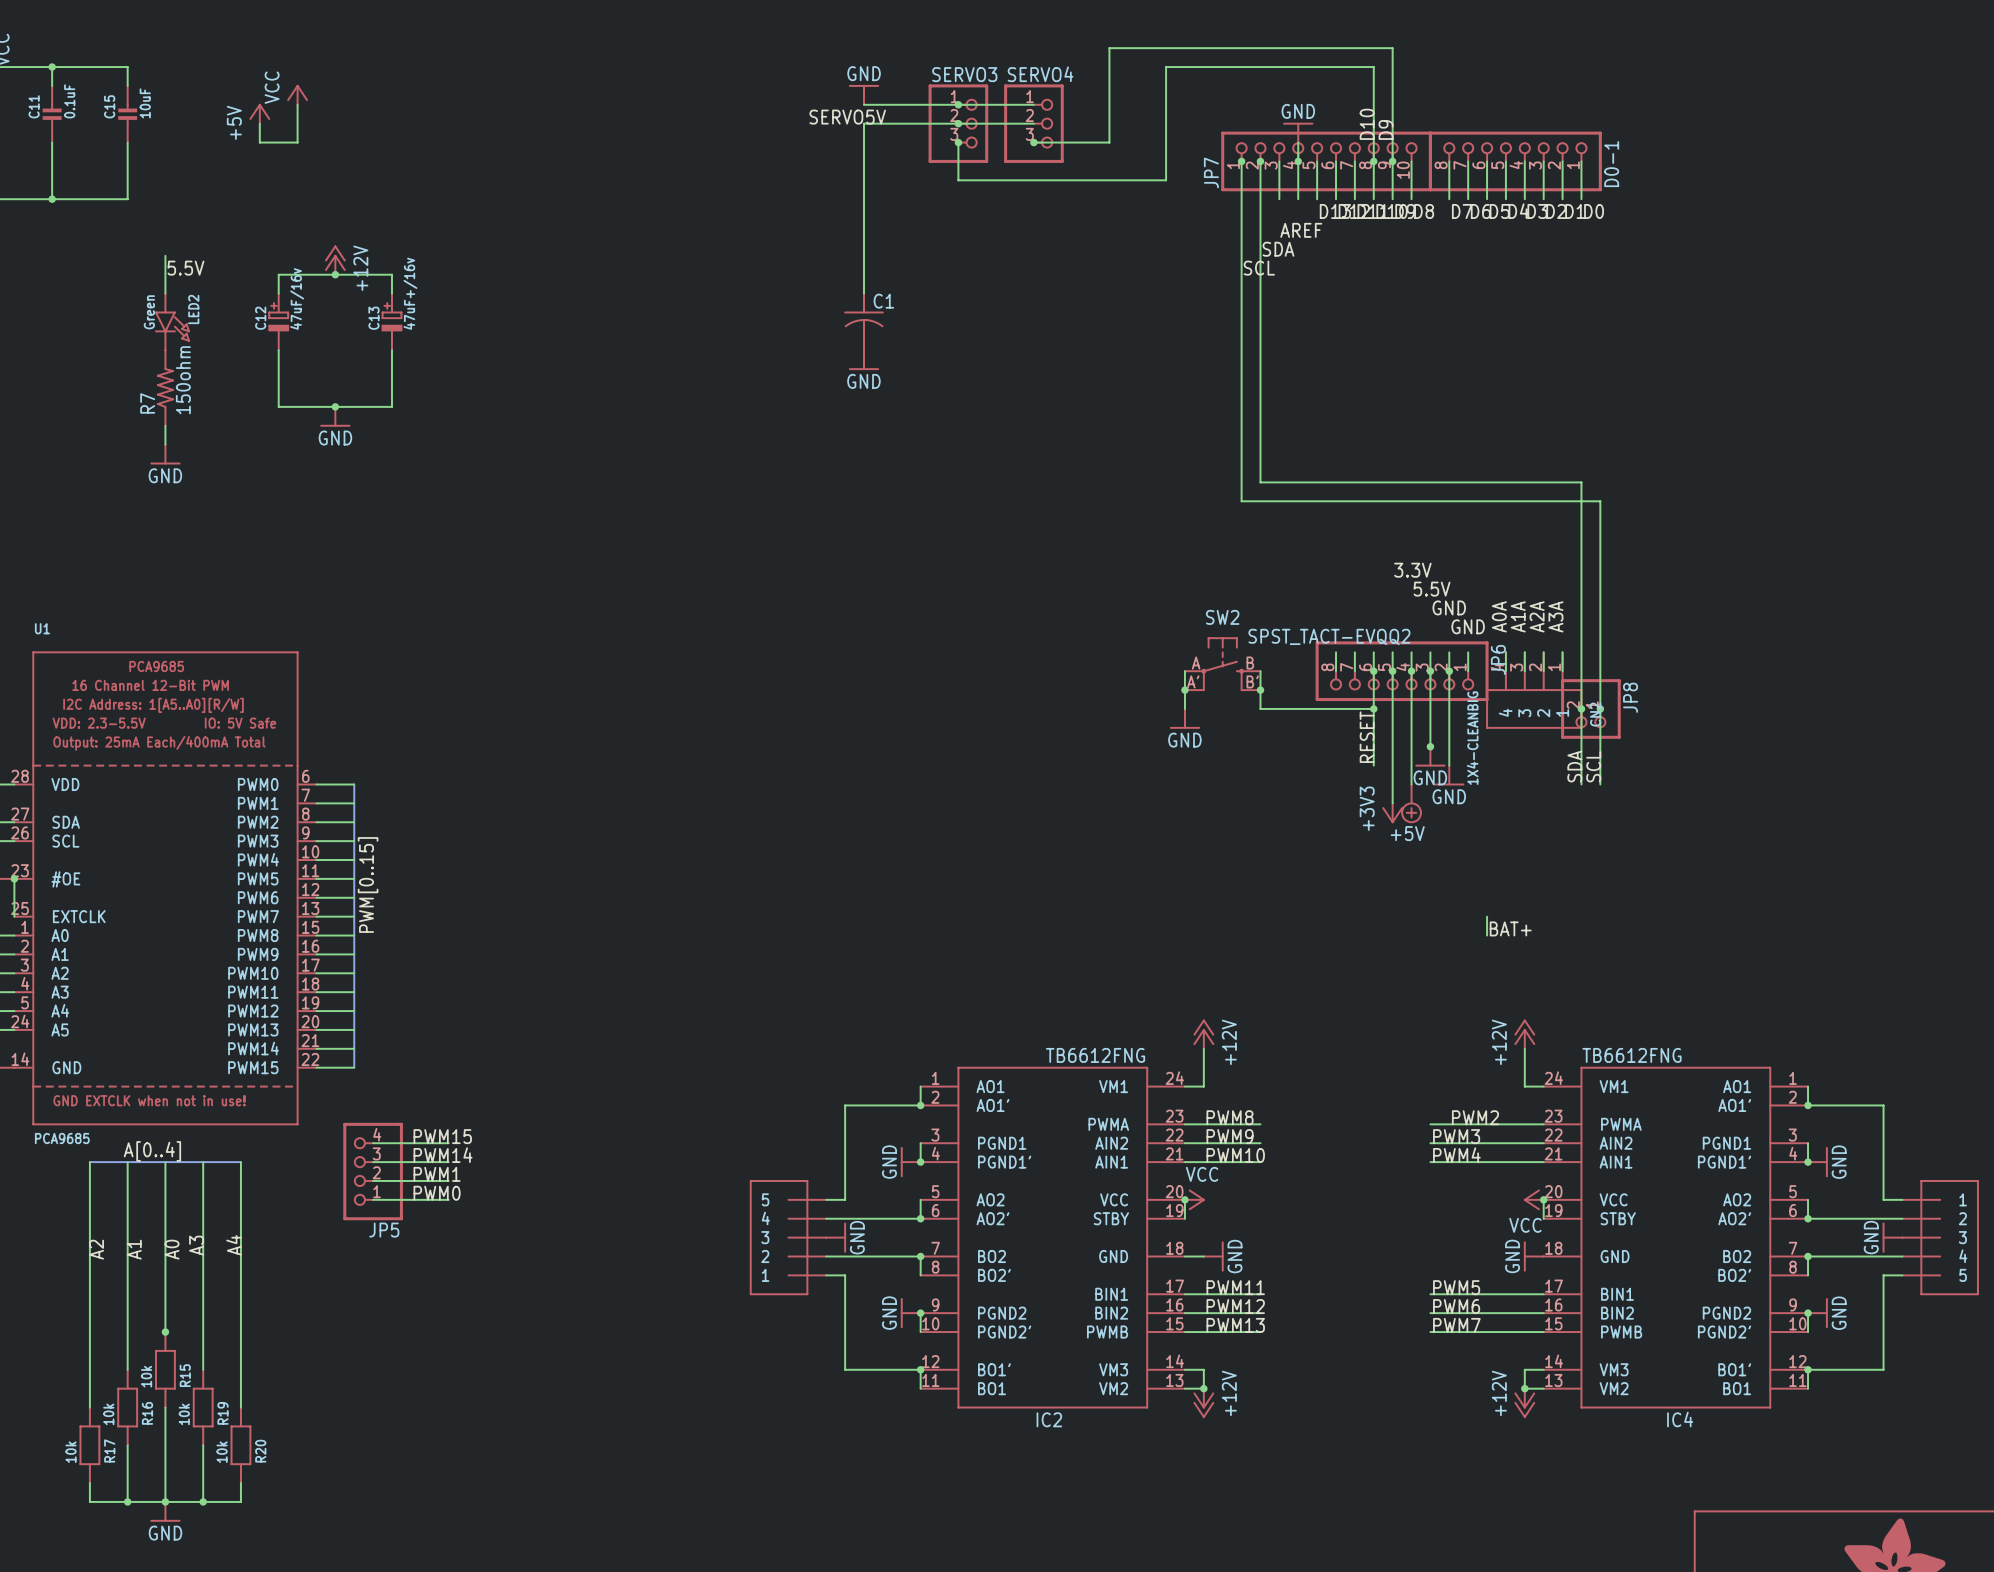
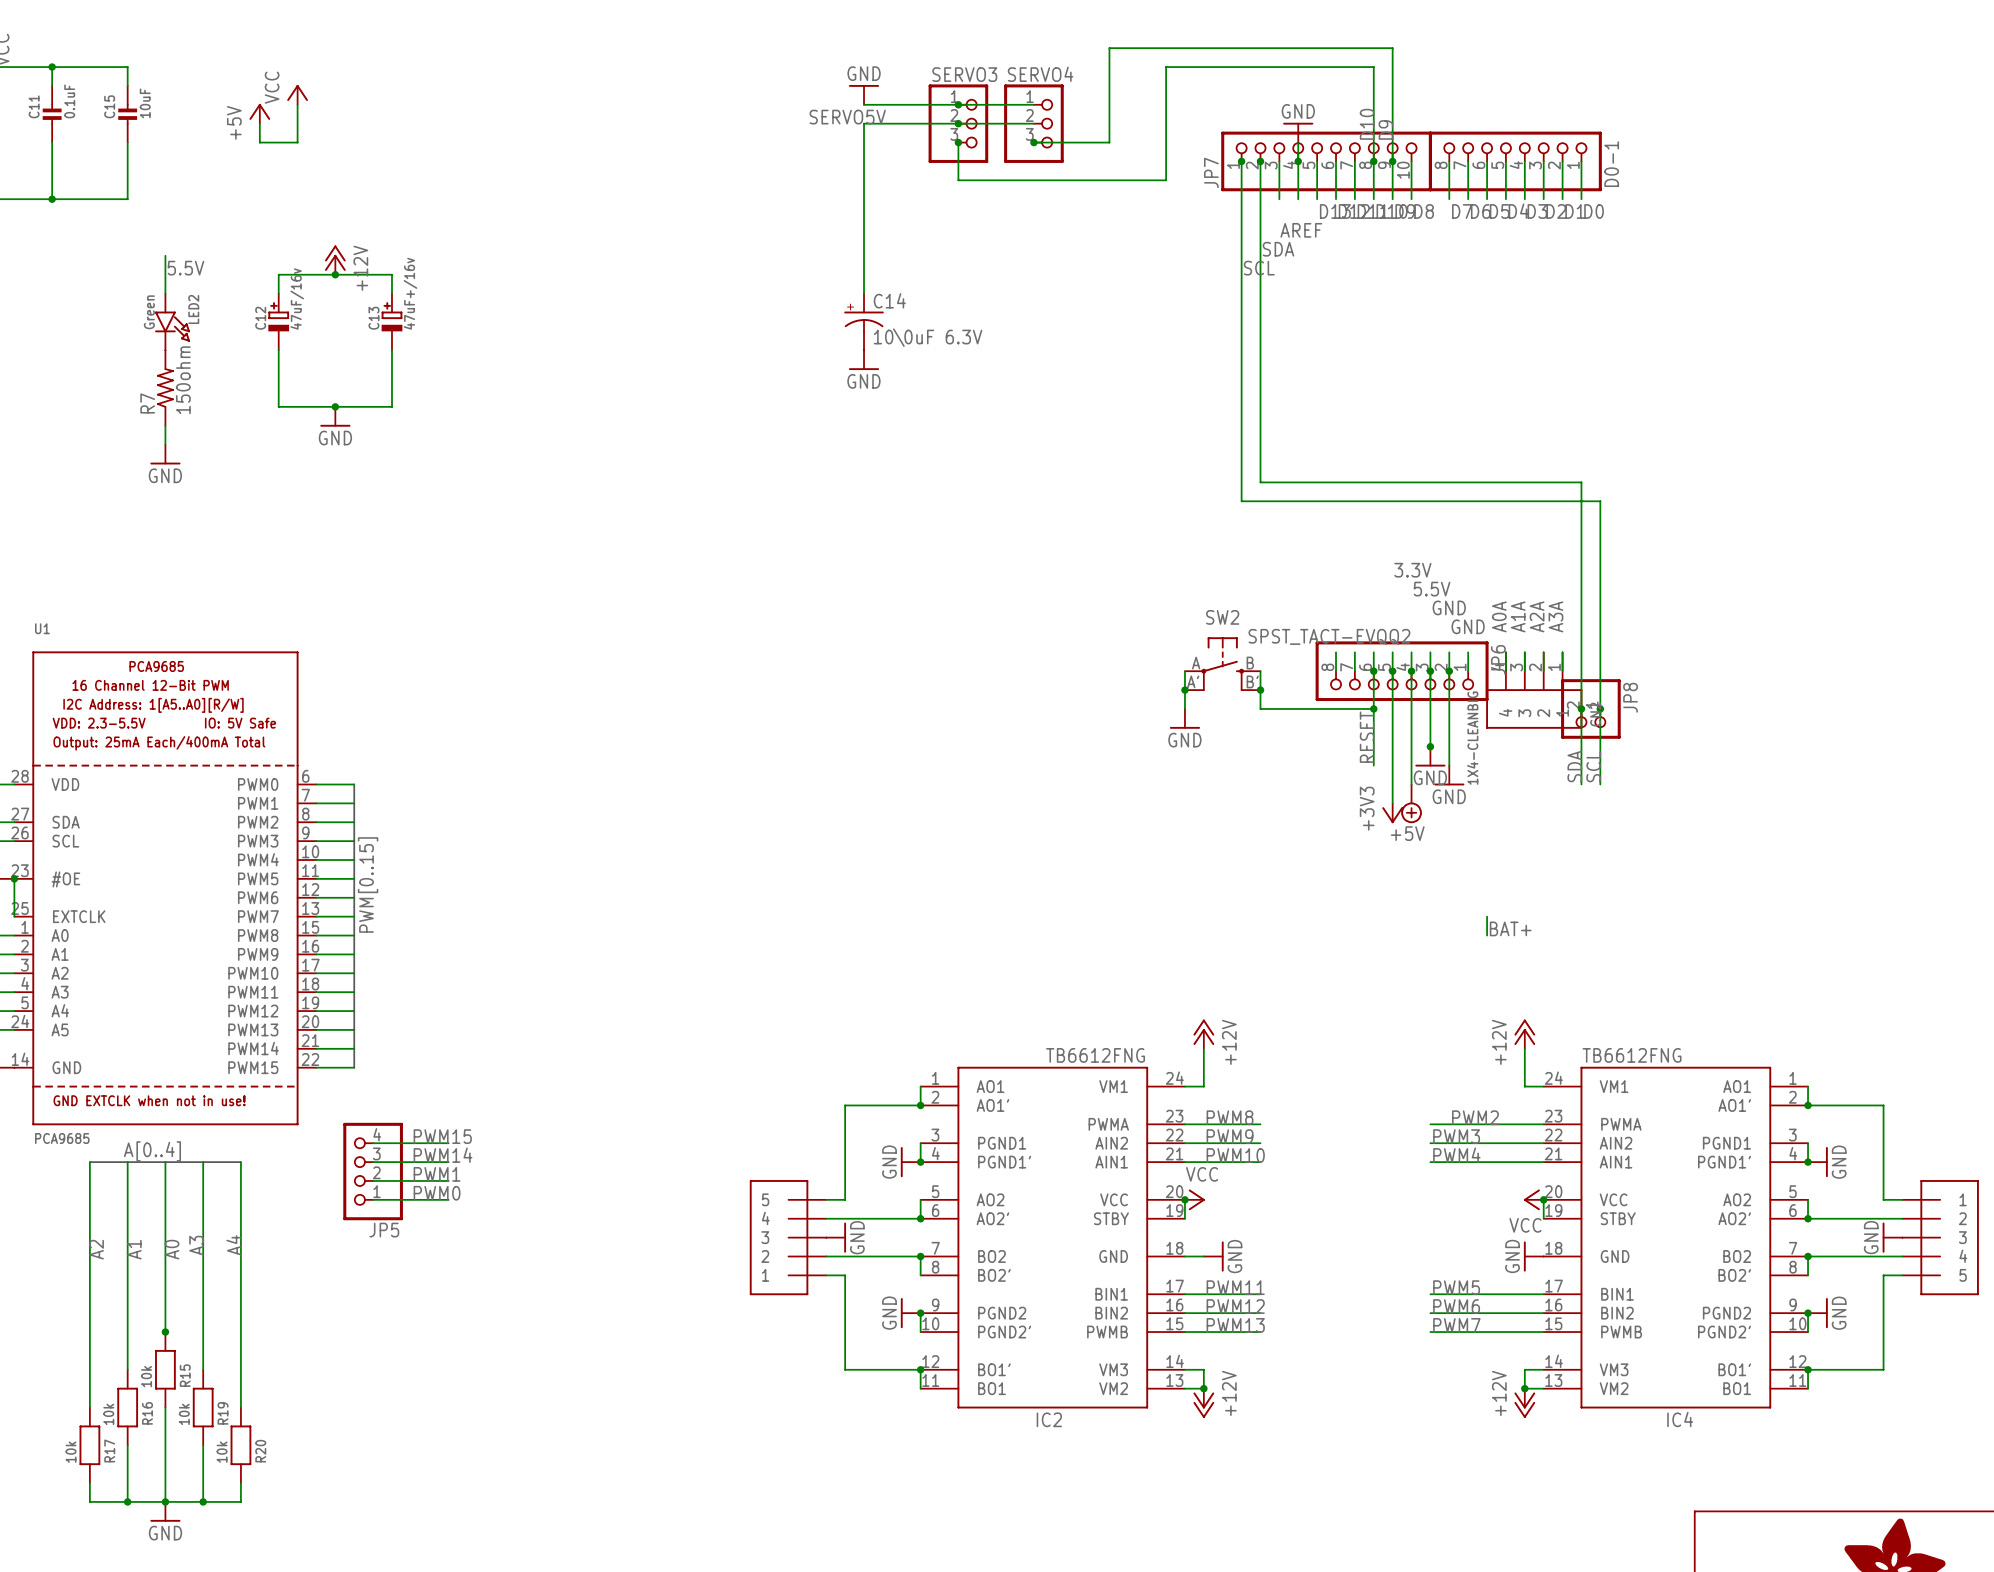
C14: none -> 10\0uF 6.3V (864, 321)

